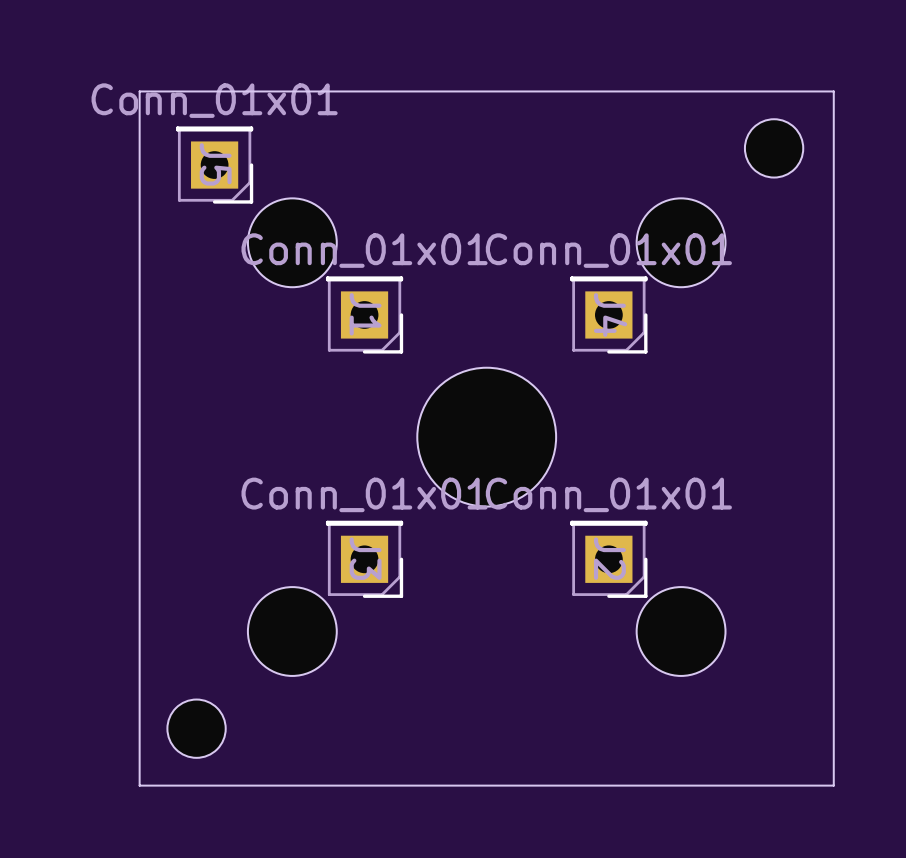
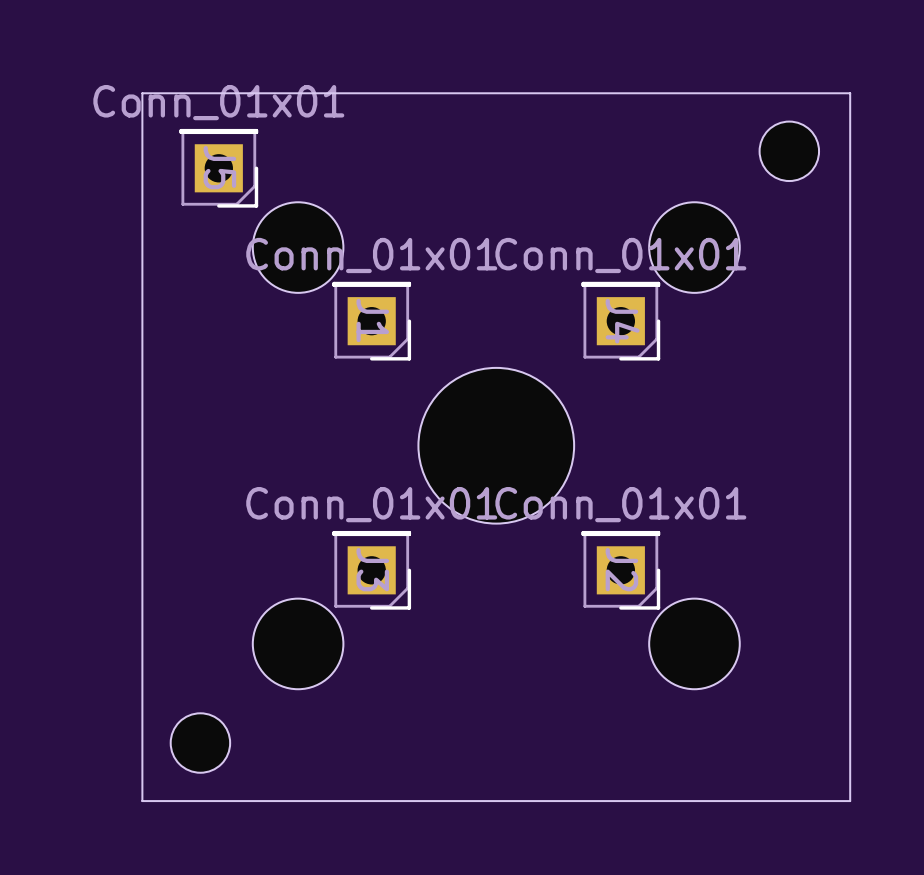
part footprint: [417, 367, 557, 507] -> [418, 367, 575, 524]

